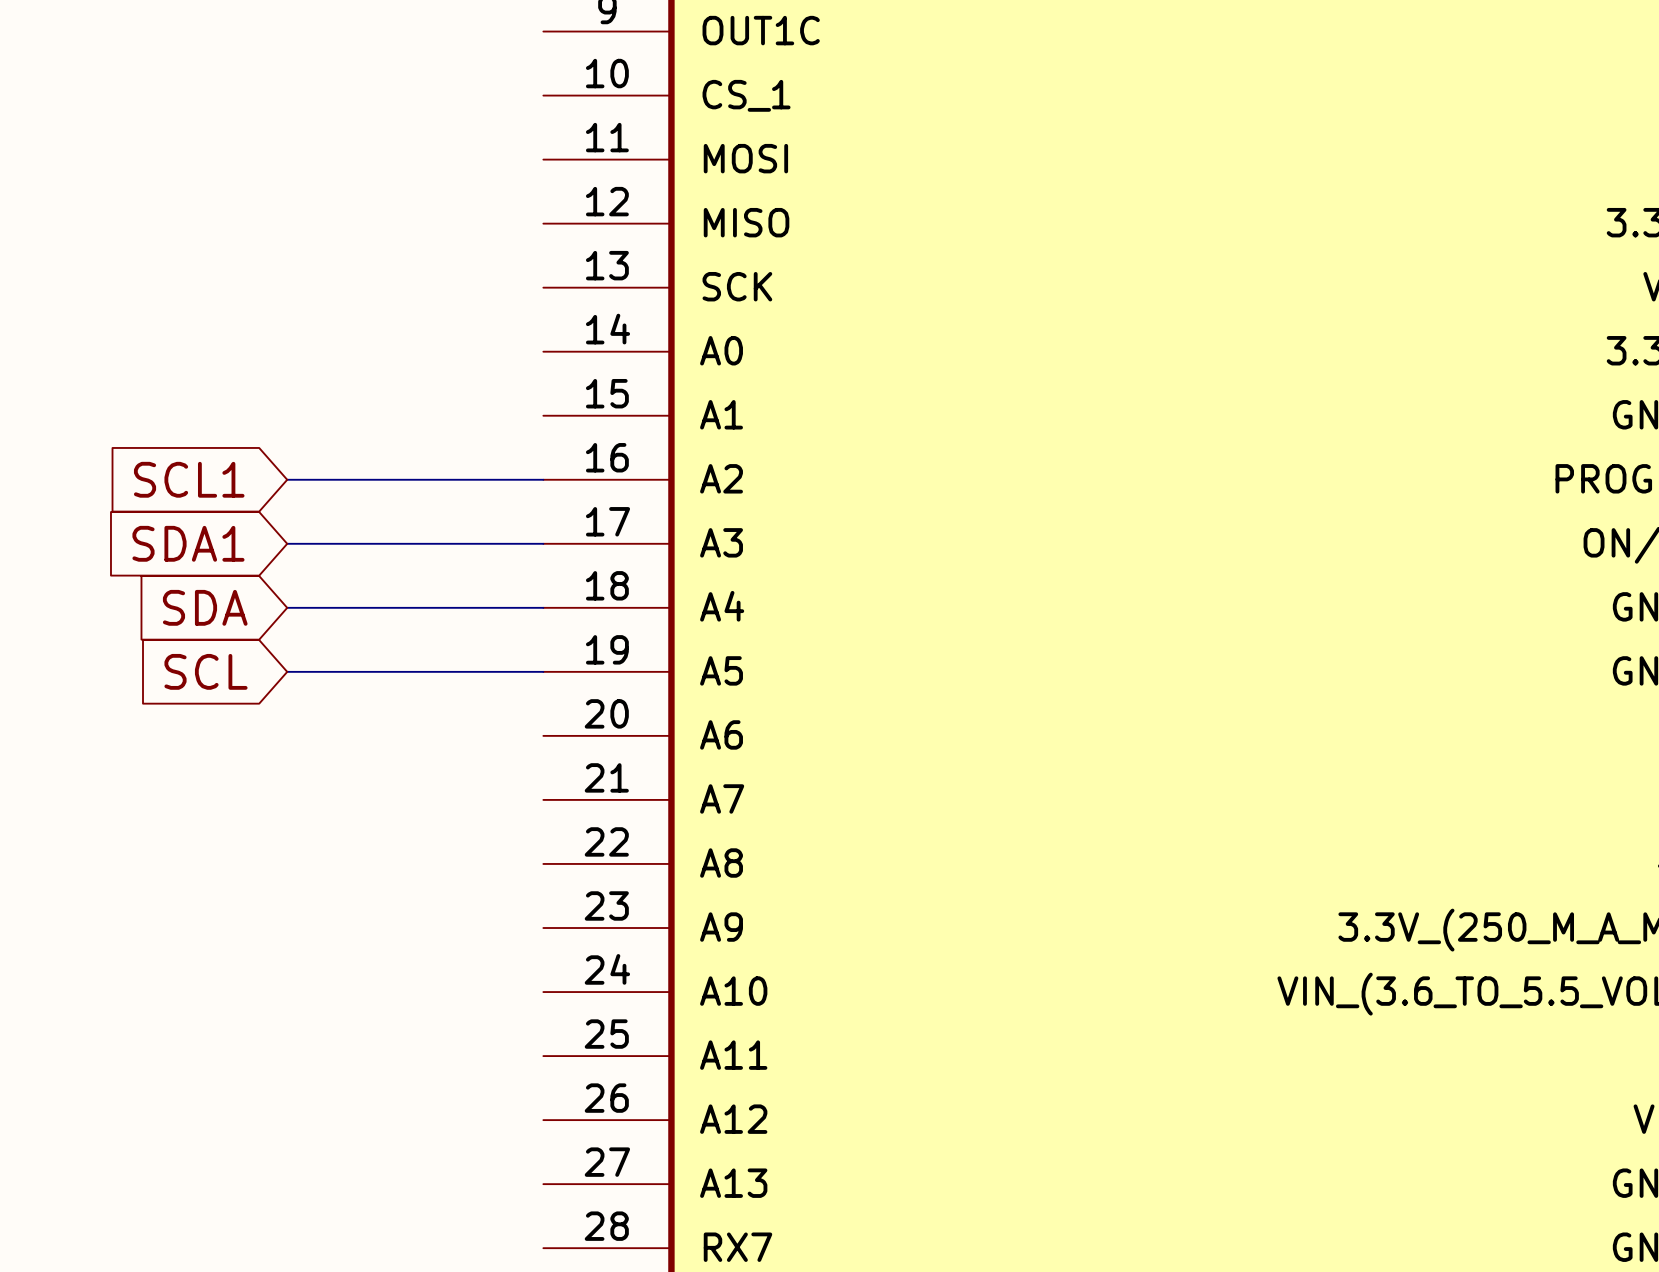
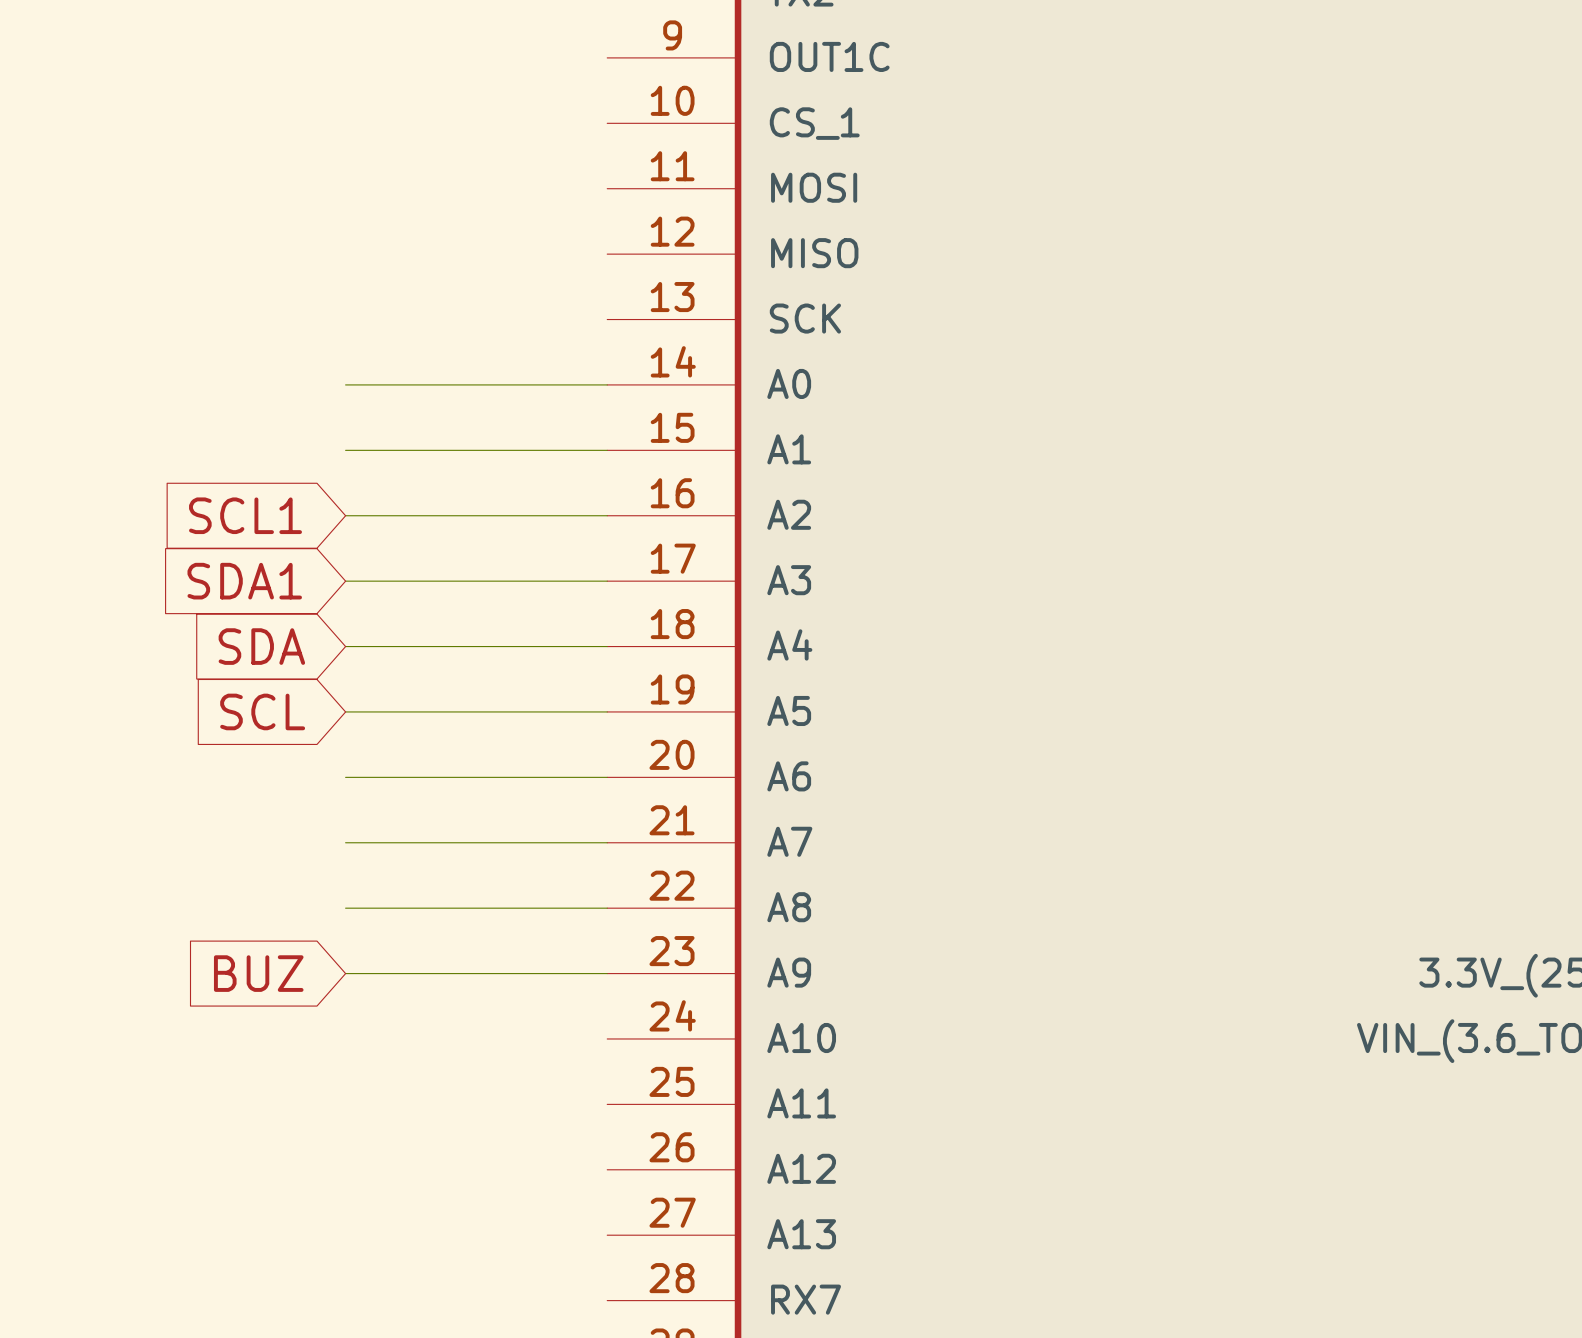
wire: none -> (345, 384) (607, 384)
wire: none -> (345, 450) (607, 450)
wire: none -> (345, 777) (607, 777)
wire: none -> (345, 842) (607, 842)
wire: none -> (345, 908) (607, 908)
global label: none -> BUZ (258, 973)
wire: none -> (345, 973) (607, 973)

